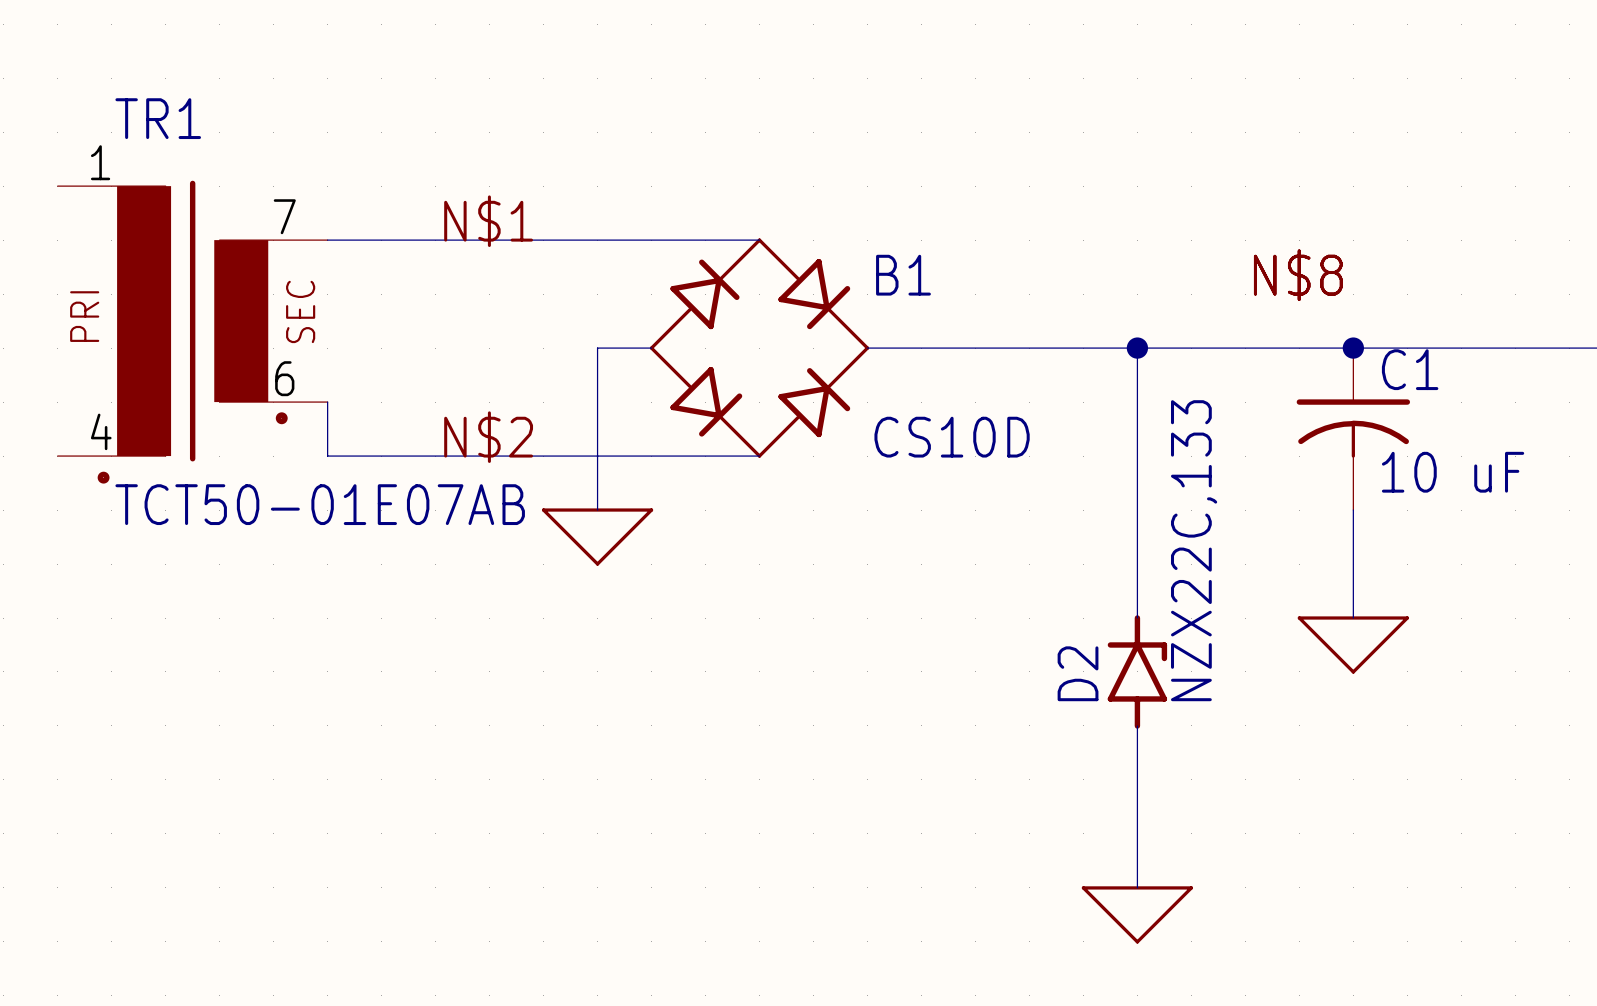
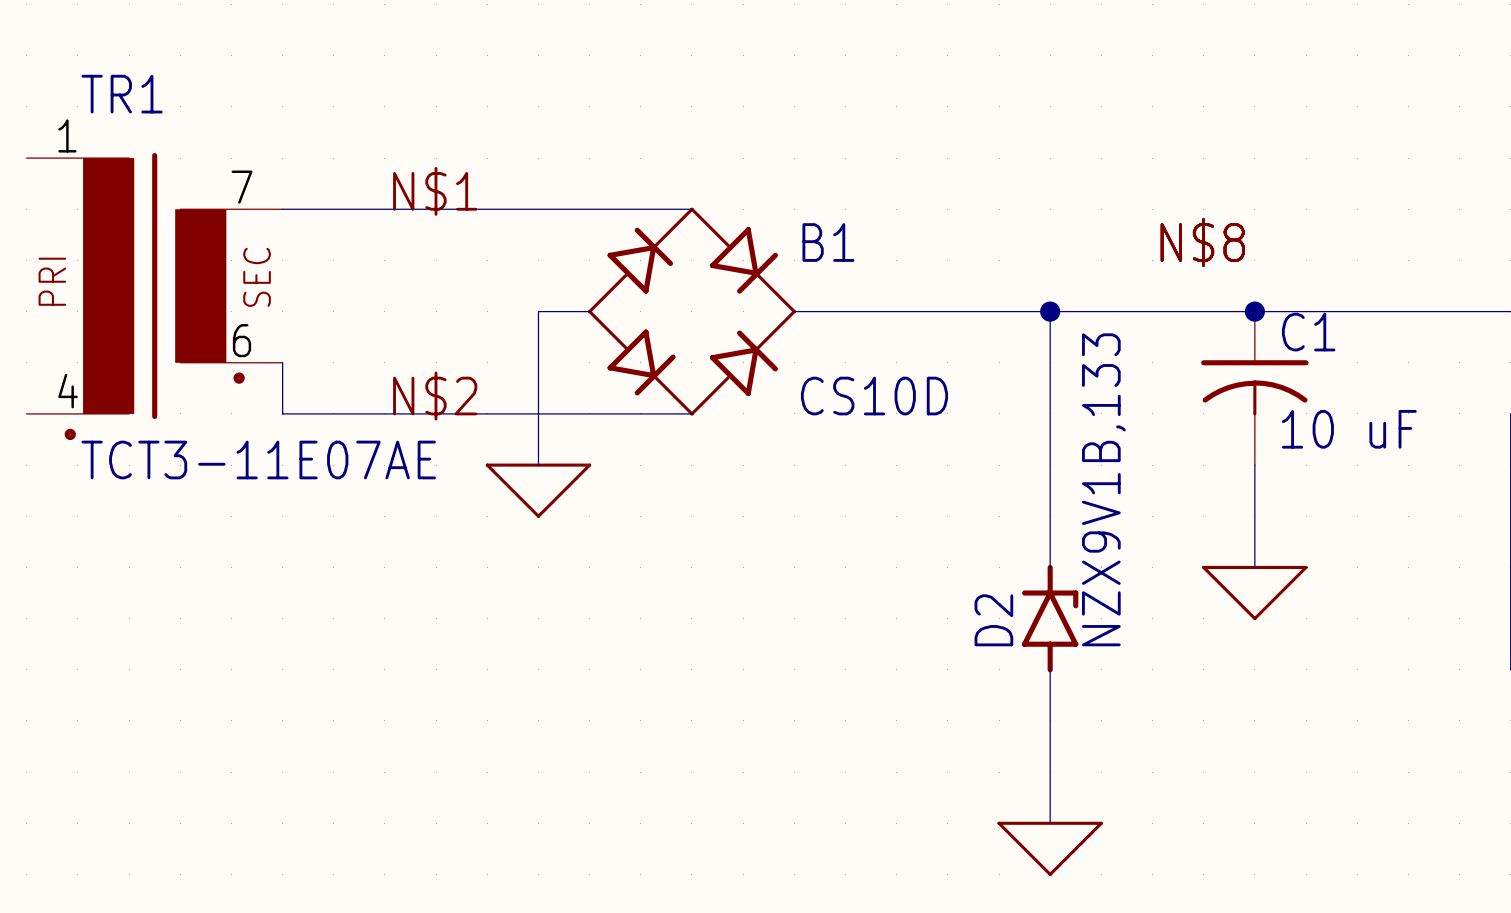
TR1 value: TCT50-01E07AB (320, 504) -> TCT3-11E07AE (258, 459)
D2 value: NZX22C,133 (1194, 550) -> NZX9V1B,133 (1103, 489)

